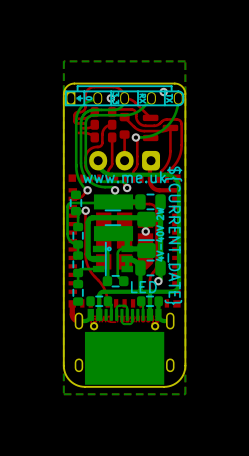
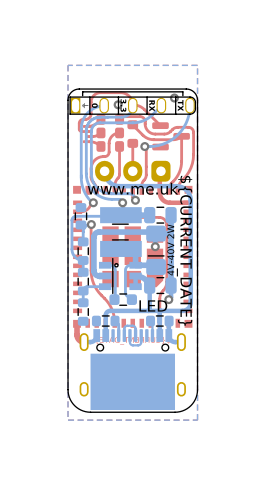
part footprint: [65, 90, 184, 106] -> [69, 96, 197, 115]

